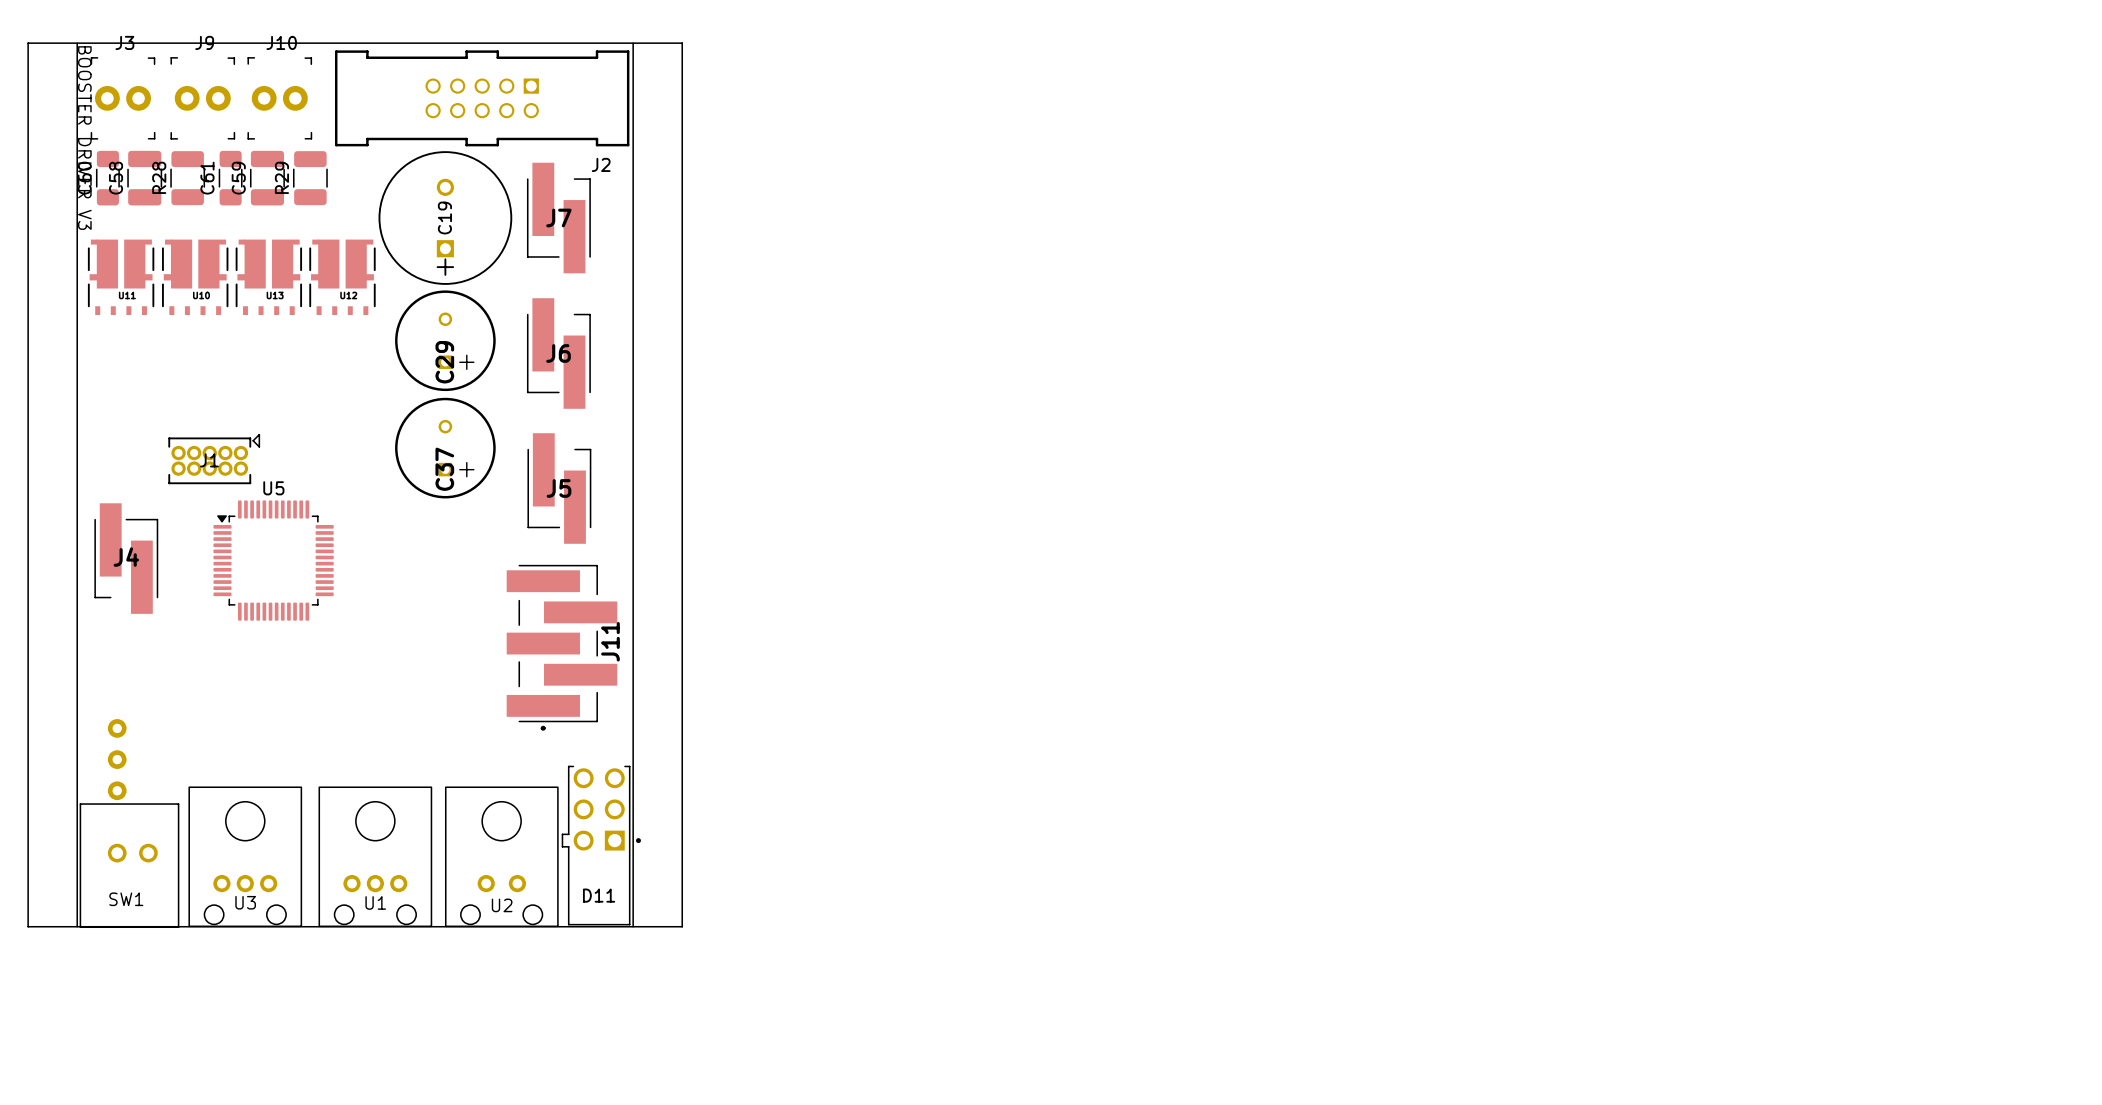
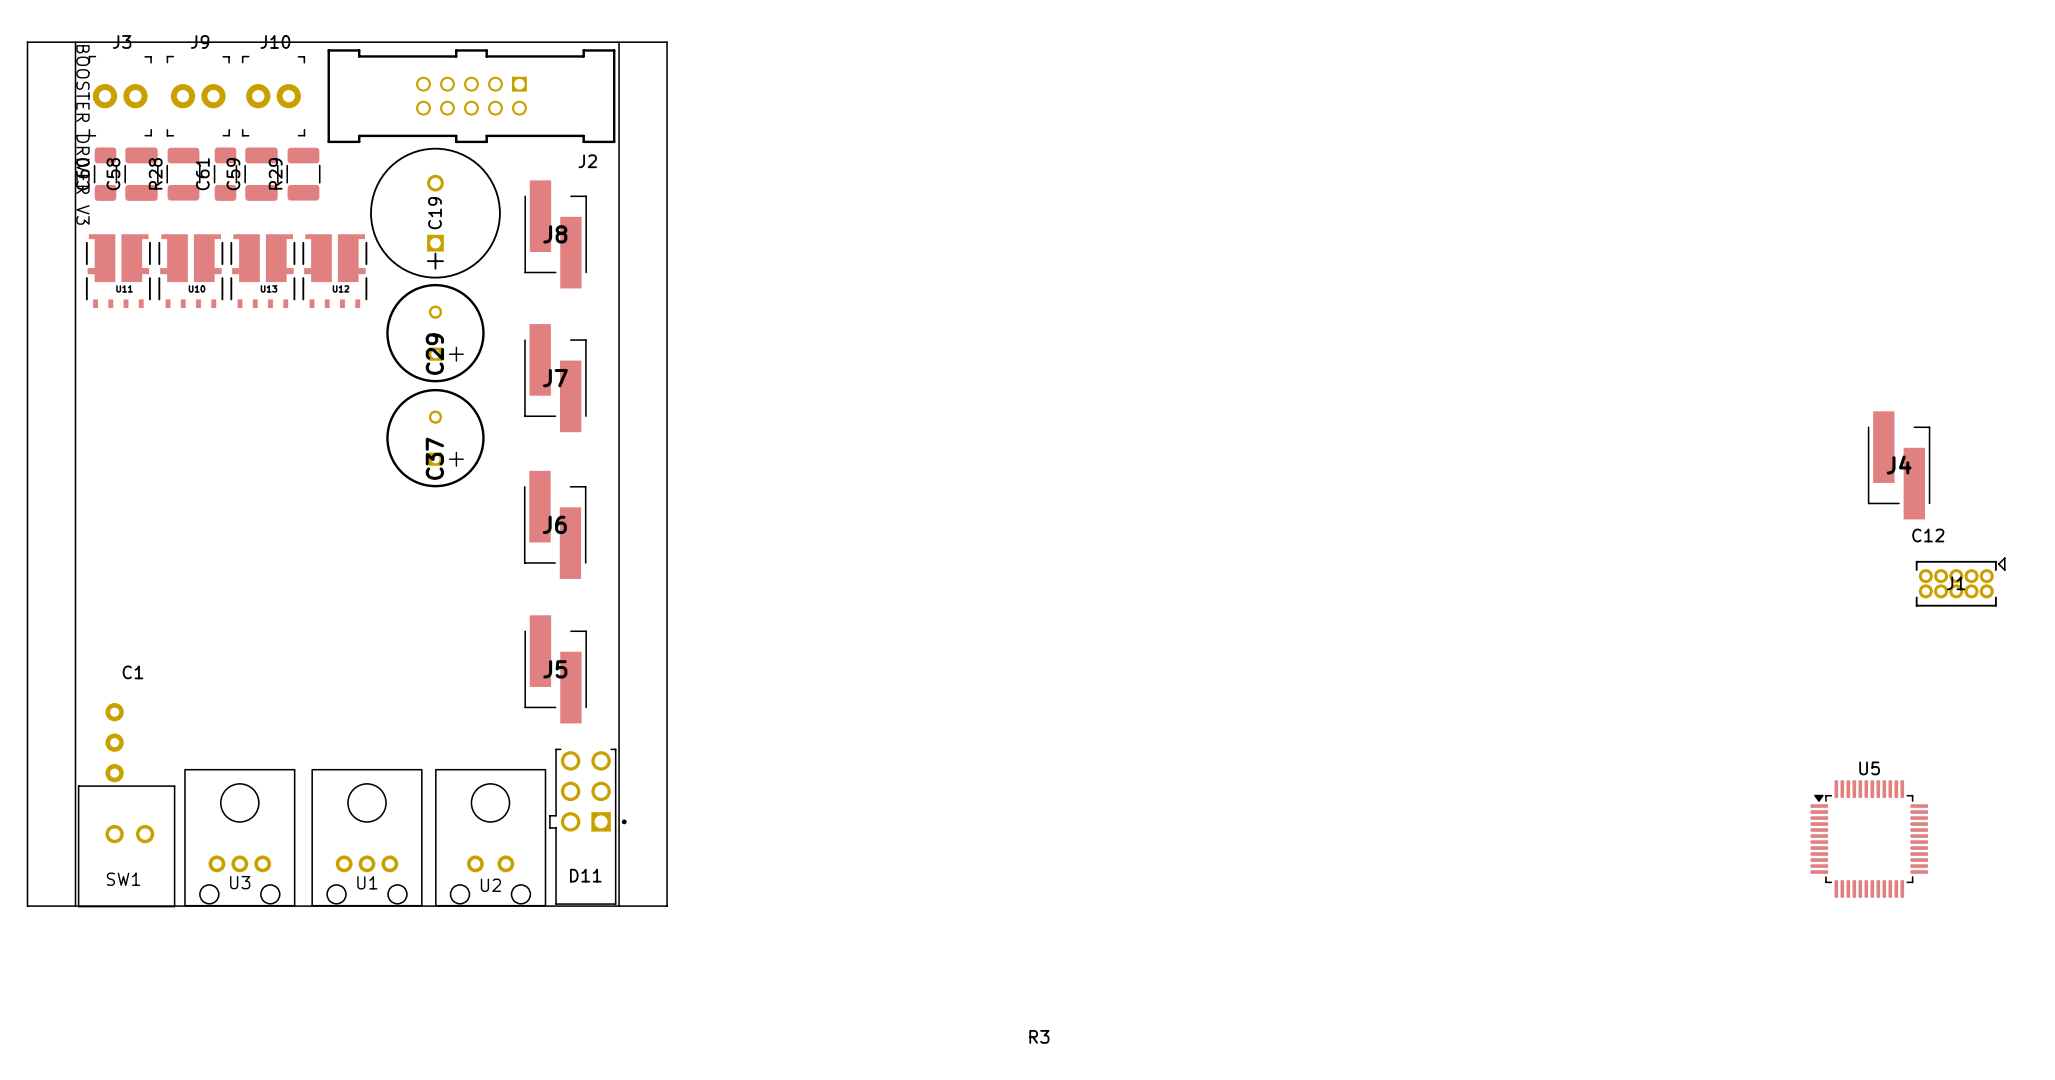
J7 position: (558, 218) -> (555, 378)
J8: none -> (555, 234)
J6 position: (558, 353) -> (555, 524)
J1 position: (214, 459) -> (1960, 582)
J5 position: (559, 488) -> (555, 669)
C12: none -> (1928, 535)
J4 rotation: 0° (126, 558) -> 180° (1899, 465)
J4 position: (126, 558) -> (1899, 465)
U5 position: (273, 560) -> (1869, 839)
J11: (561, 647) -> none
C1: none -> (132, 672)
R3: none -> (1039, 1036)

